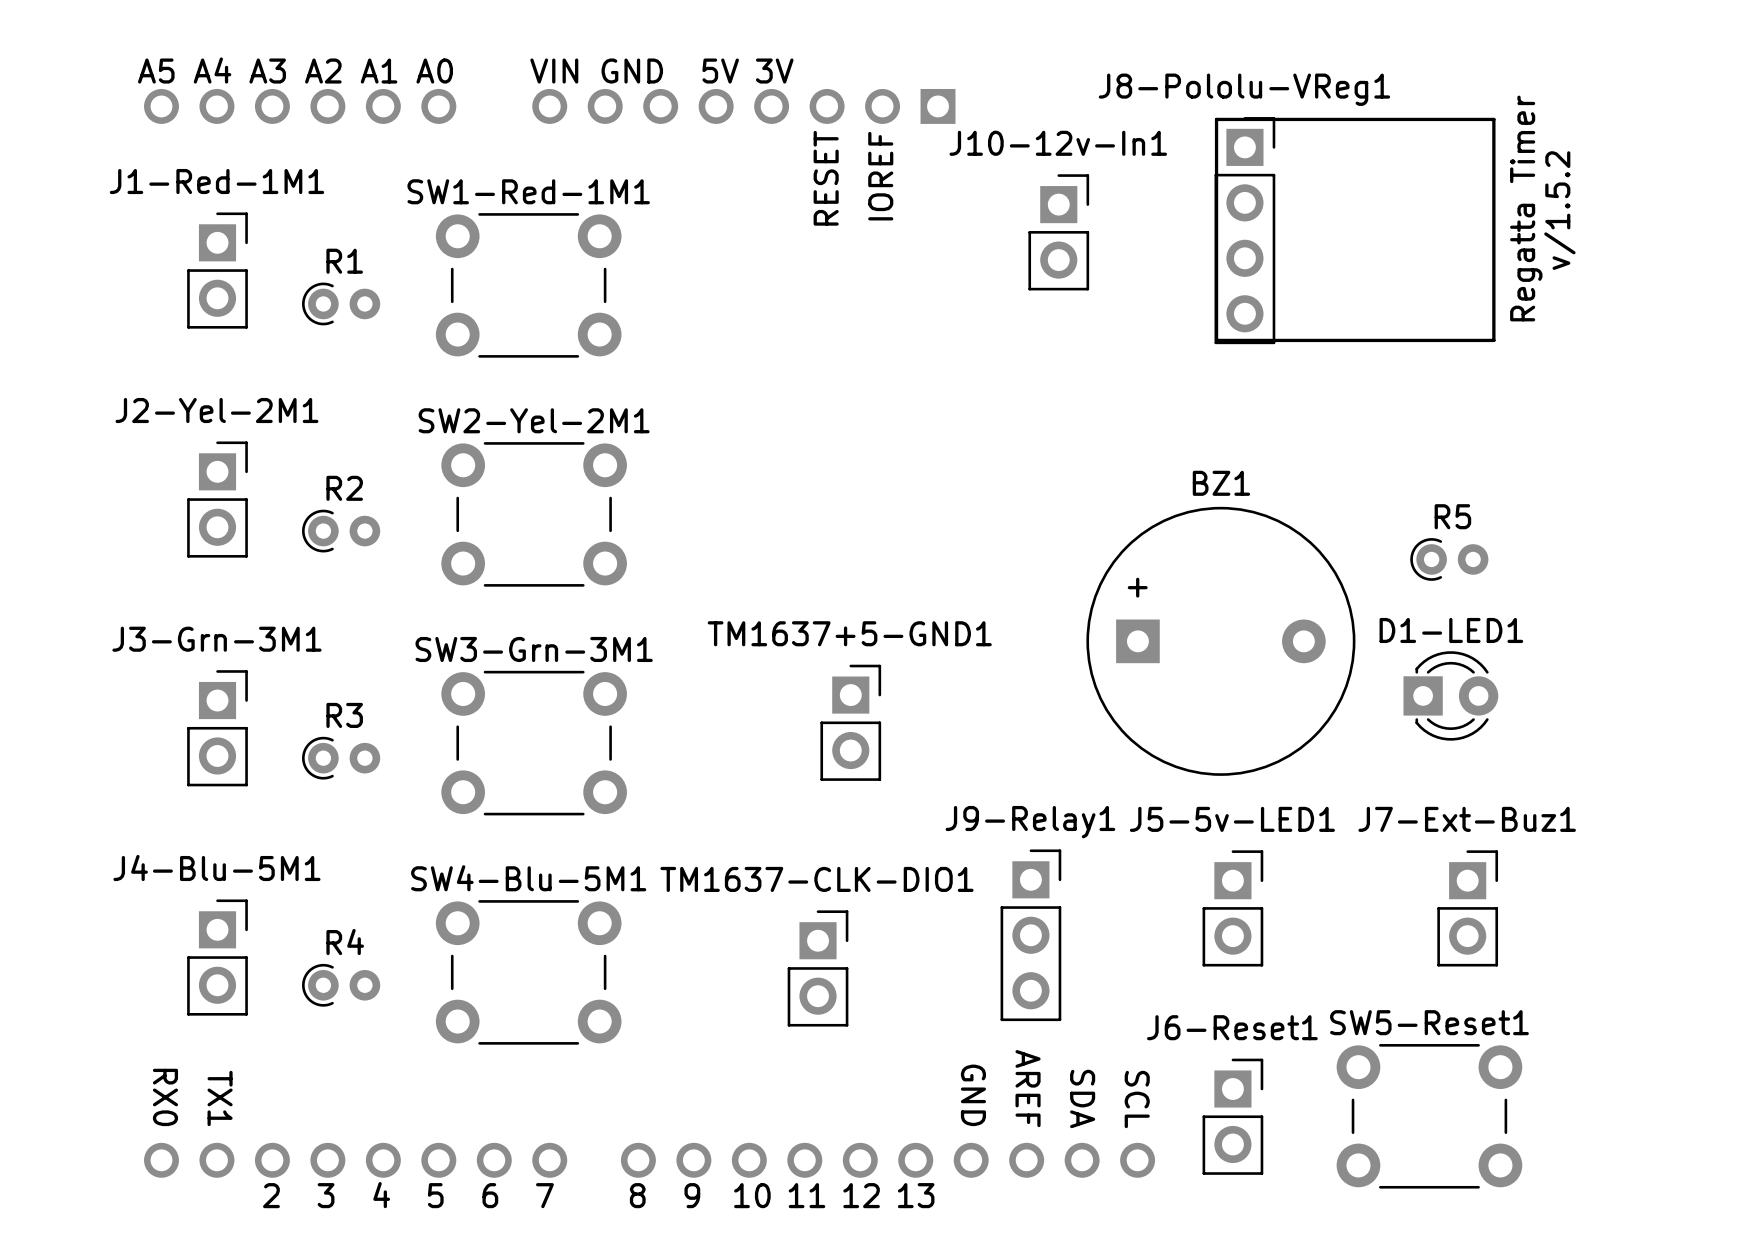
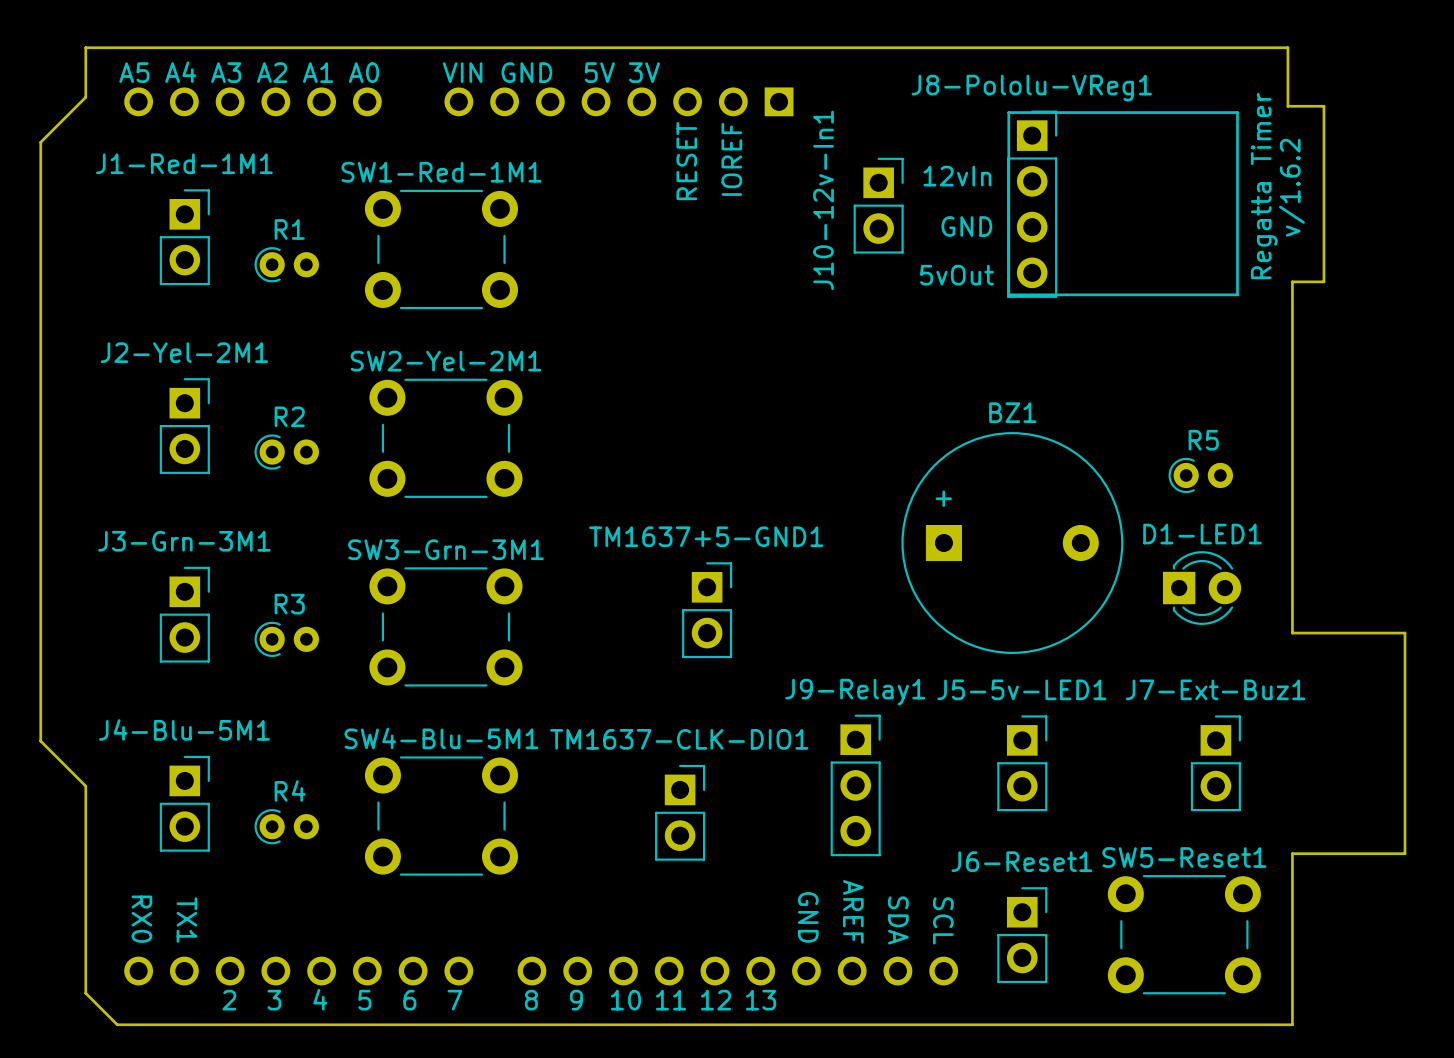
board edge: none -> (85, 47) (85, 97) (40, 142) (40, 741) (85, 786) (85, 993) (117, 1024) (1292, 1024) (1292, 853) (1404, 853) (1404, 633) (1292, 633) (1292, 281) (1323, 281) (1323, 106) (1287, 106) (1287, 47) (85, 47)
J10-12v-In1 name rotation: 0° (1058, 143) -> 90° counterclockwise (823, 200)
text: none -> 12vIn (957, 176)
text: v/1.5.2 (1559, 210) -> v/1.6.2 (1291, 187)
text: none -> GND (966, 226)
text: none -> 5vOut (956, 275)

